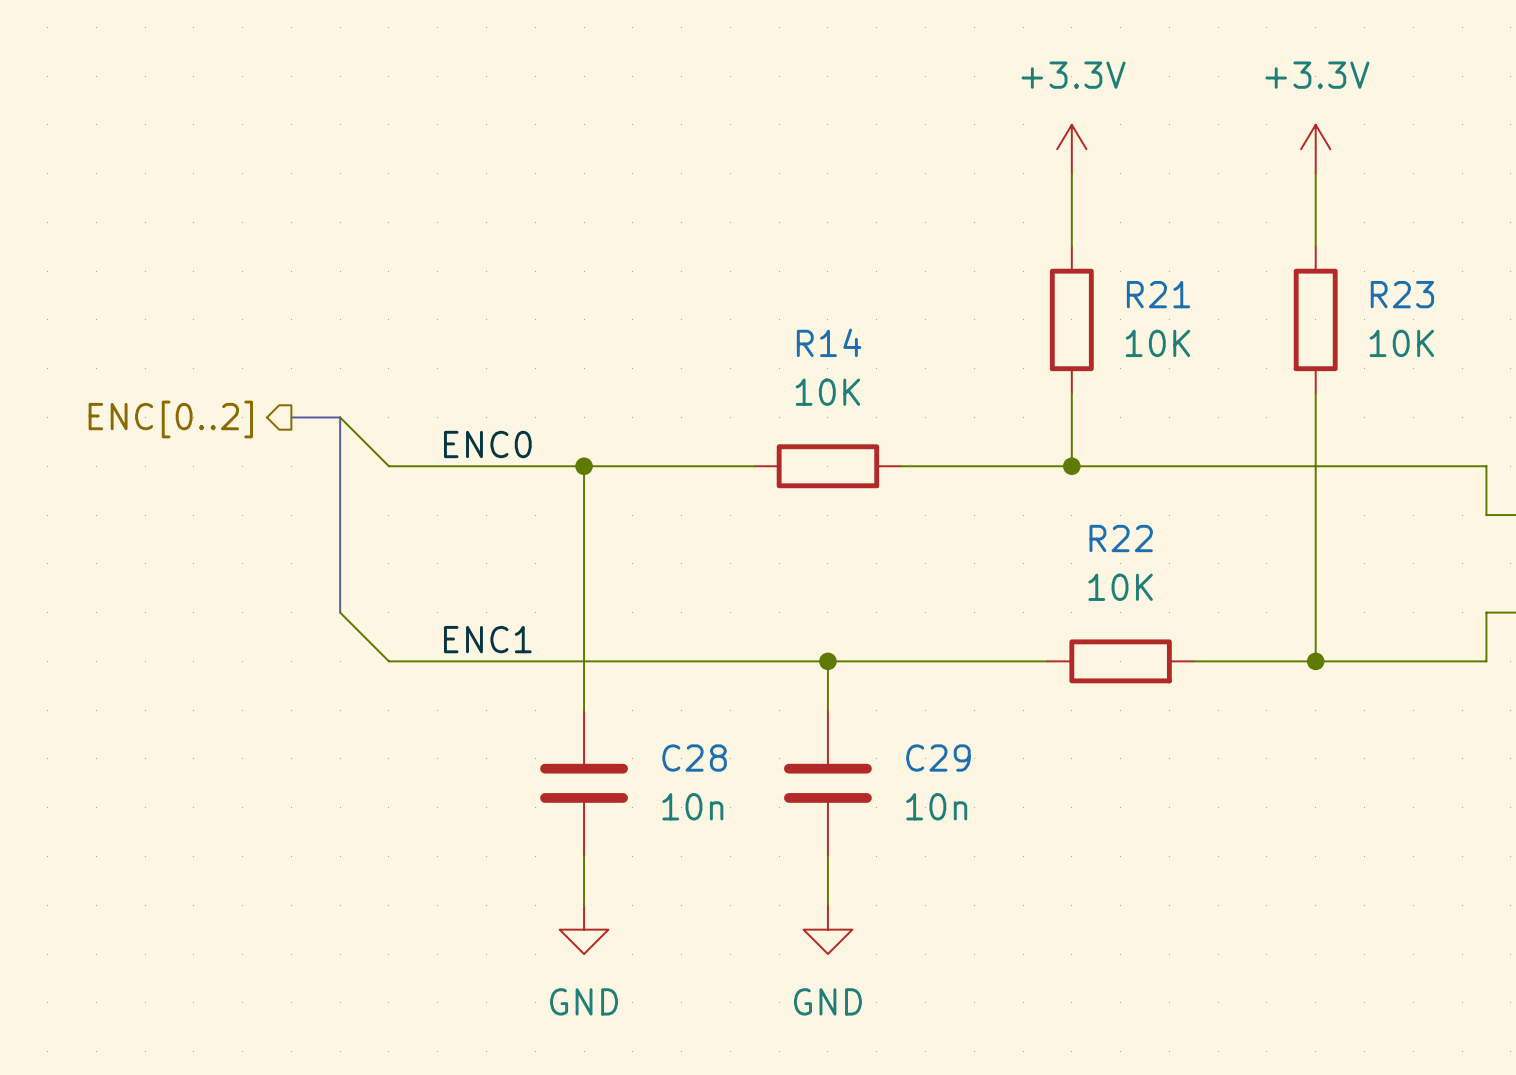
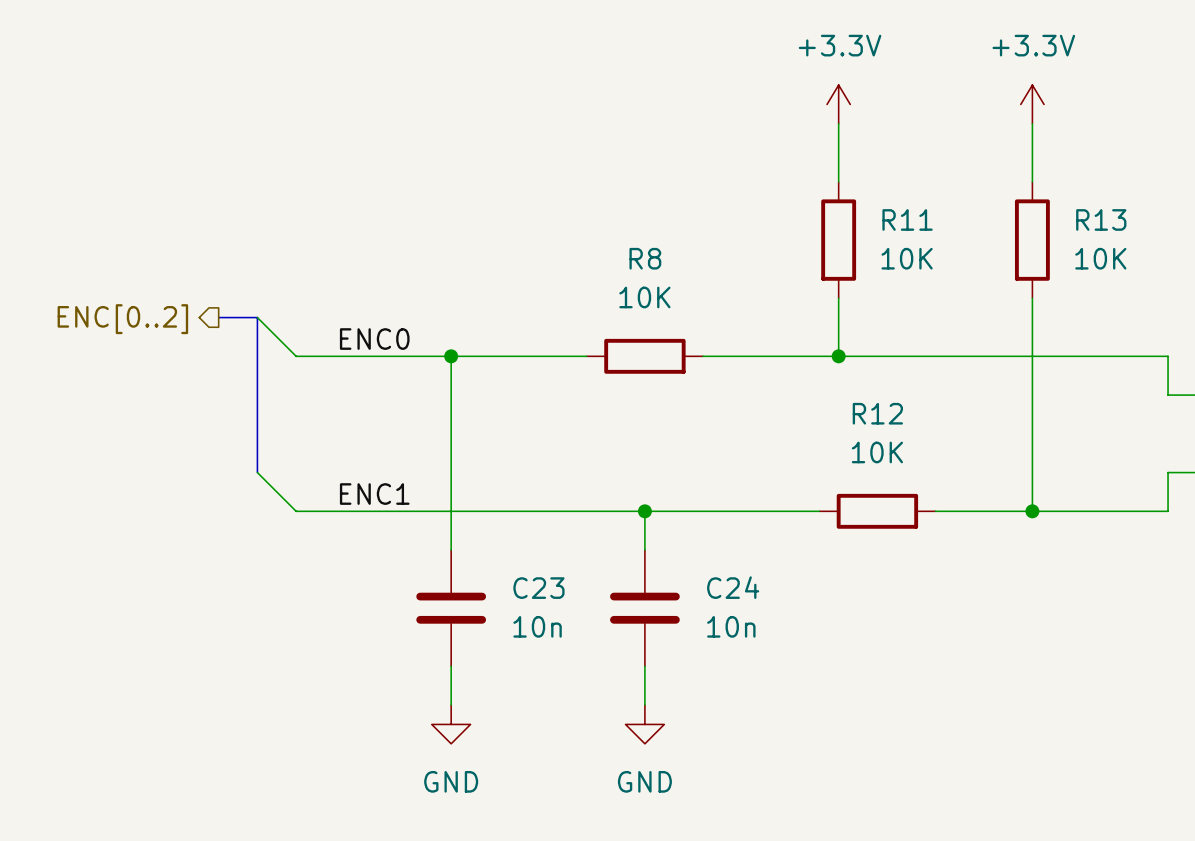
R21 name: R21 (1158, 294) -> R11 (907, 219)
R23 name: R23 (1402, 294) -> R13 (1101, 219)
R14 name: R14 (829, 342) -> R8 (645, 258)
R22 name: R22 (1121, 538) -> R12 (877, 413)
C28 name: C28 (694, 758) -> C23 (538, 588)
C29 name: C29 (938, 758) -> C24 (733, 587)

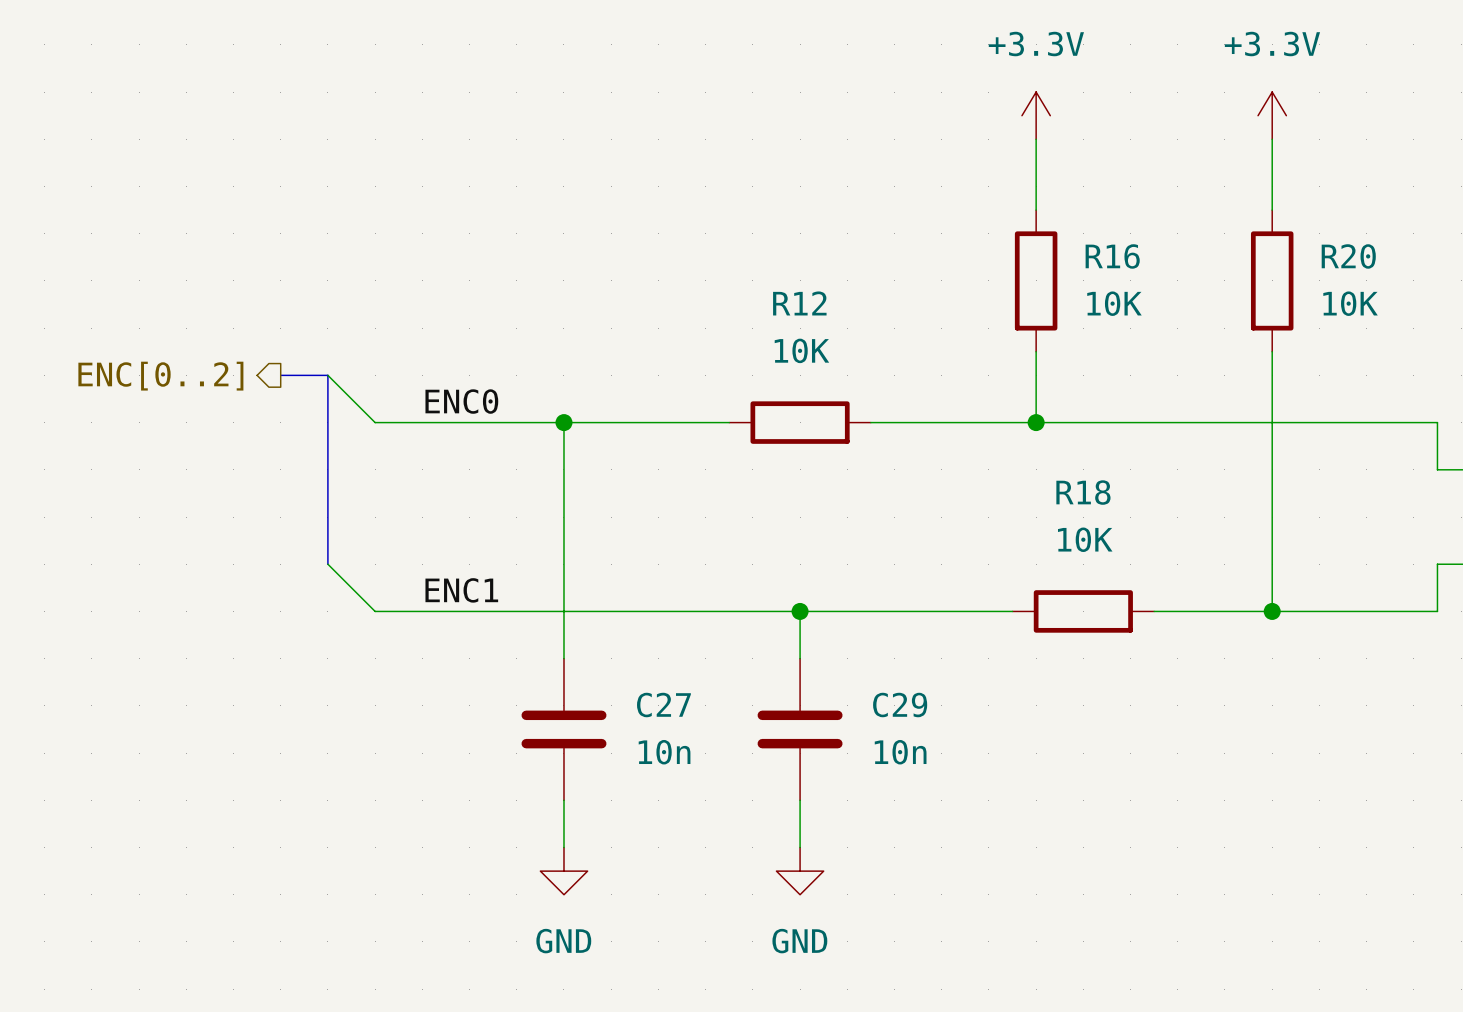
R11 name: R11 (907, 219) -> R16 (1112, 256)
R13 name: R13 (1101, 219) -> R20 (1348, 256)
R8 name: R8 (645, 258) -> R12 (799, 303)
R12 name: R12 (877, 413) -> R18 (1083, 492)
C24 name: C24 (733, 587) -> C29 (900, 705)
C23 name: C23 (538, 588) -> C27 (663, 705)

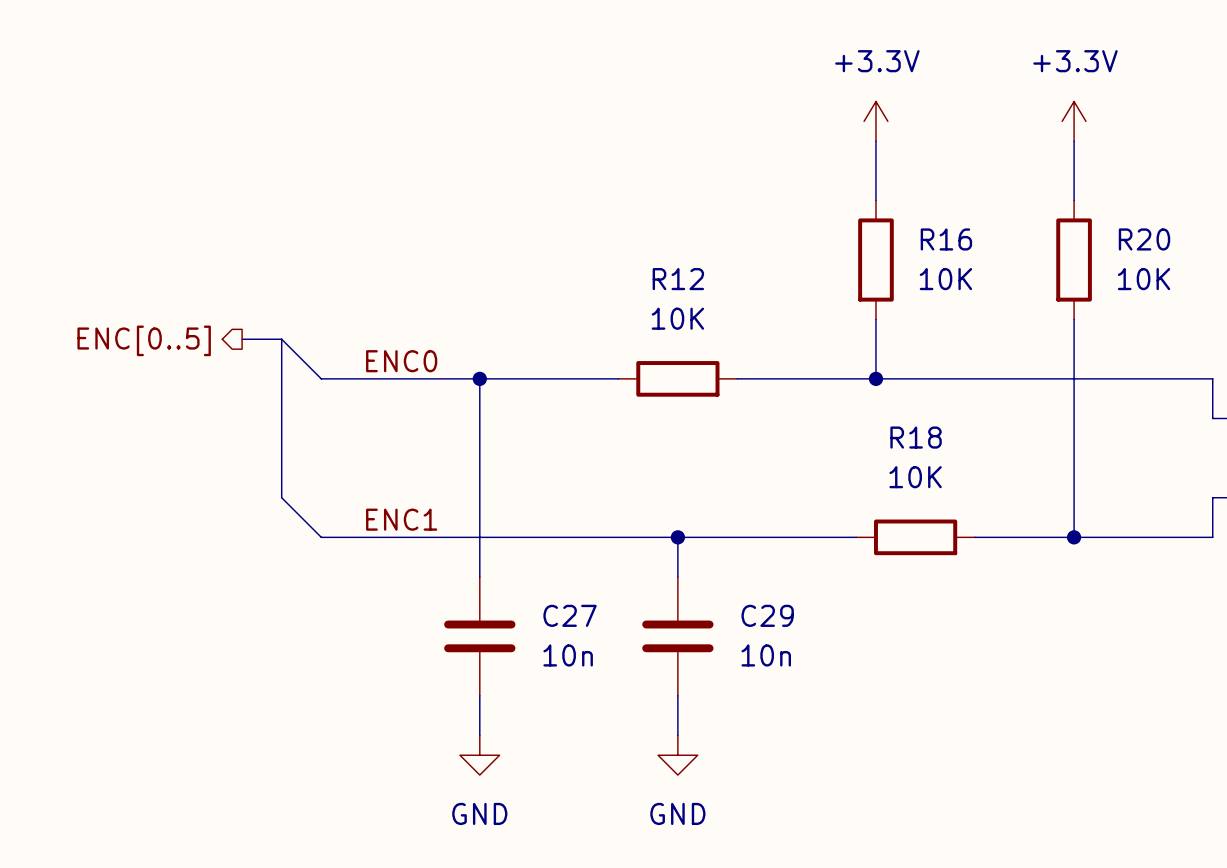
hierarchical label: ENC[0..2] (160, 376) -> ENC[0..5] (144, 340)

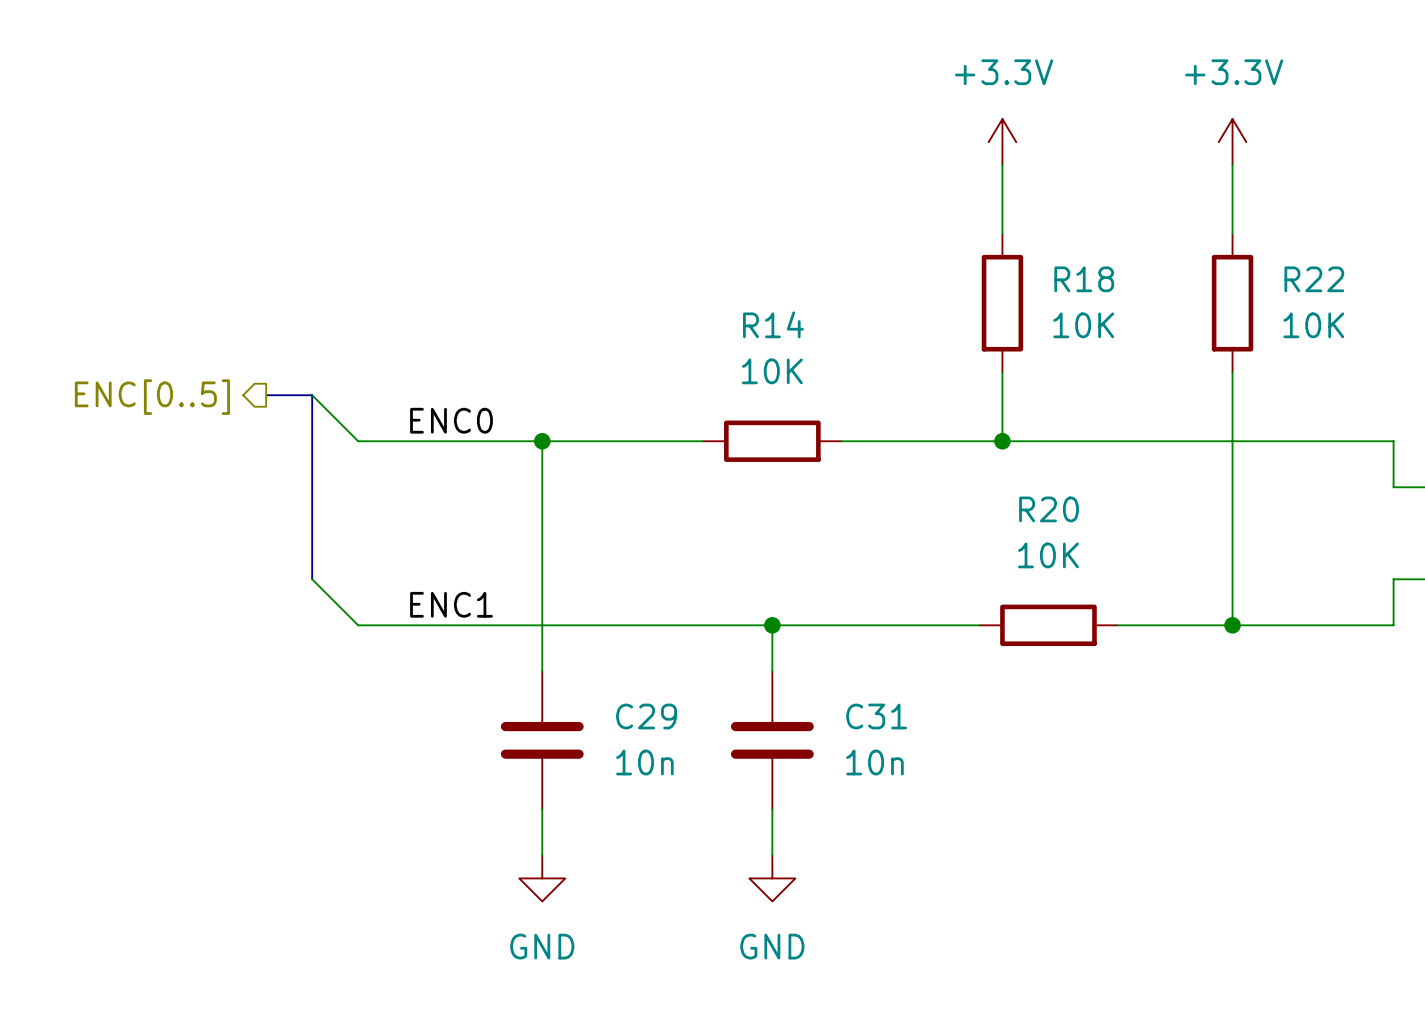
R16 name: R16 (946, 239) -> R18 (1084, 279)
R20 name: R20 (1144, 239) -> R22 (1314, 279)
R12 name: R12 (678, 279) -> R14 (773, 324)
R18 name: R18 (916, 437) -> R20 (1049, 509)
C27 name: C27 (570, 615) -> C29 (646, 716)
C29 name: C29 (767, 615) -> C31 (876, 716)

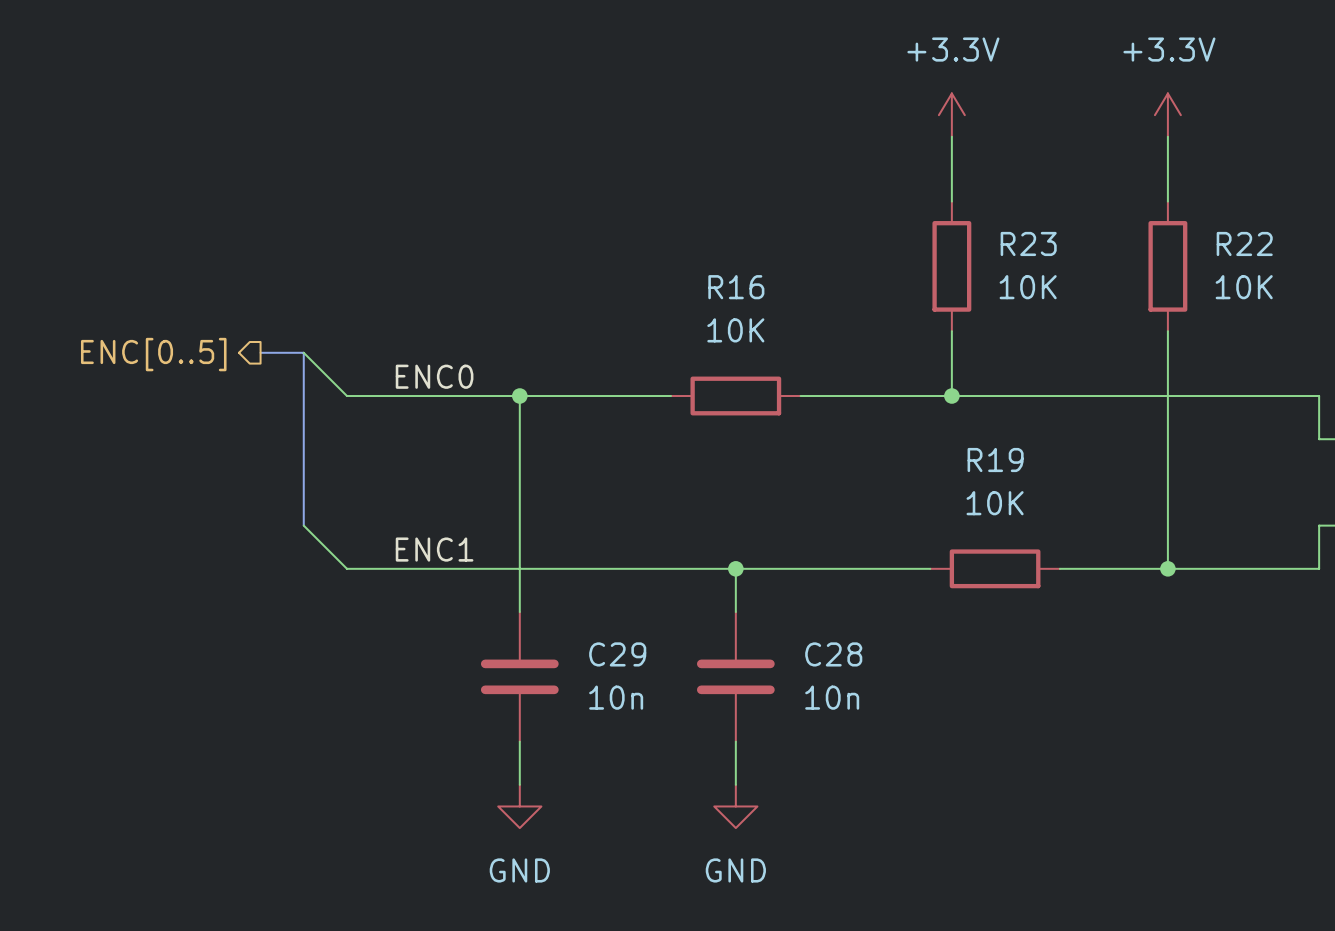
R18 name: R18 (1084, 279) -> R23 (1028, 243)
R14 name: R14 (773, 324) -> R16 (736, 287)
R20 name: R20 (1049, 509) -> R19 (995, 460)
C31 name: C31 (876, 716) -> C28 (833, 654)

